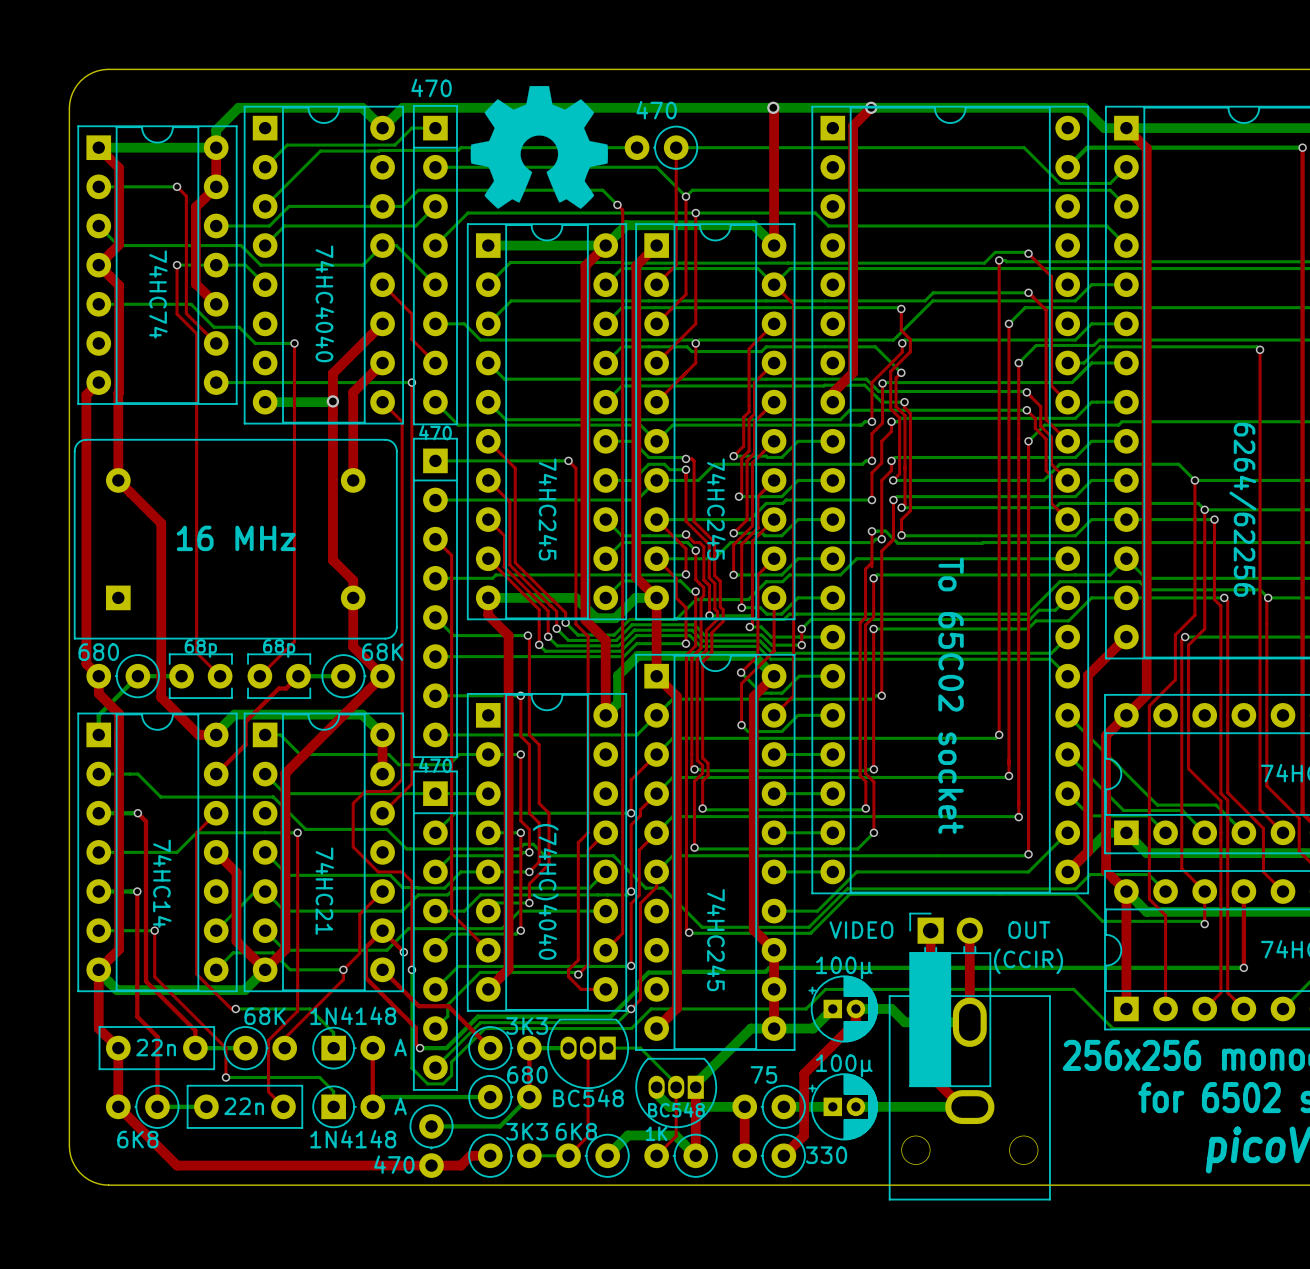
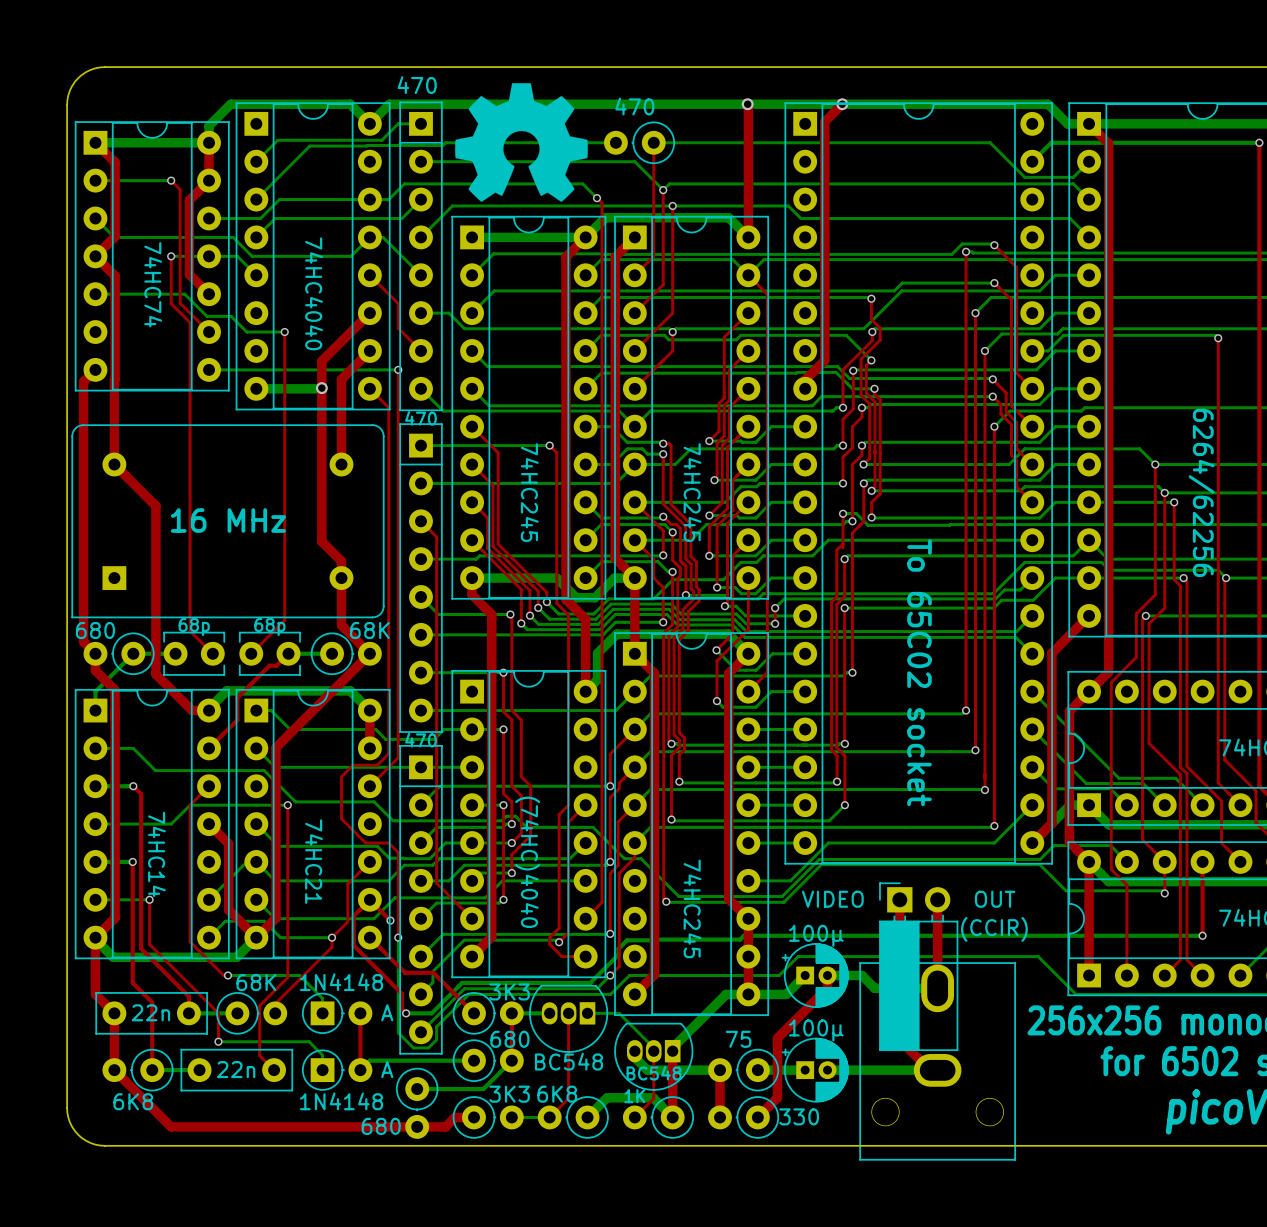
part value: 470 (394, 1164) -> 680 (381, 1126)

